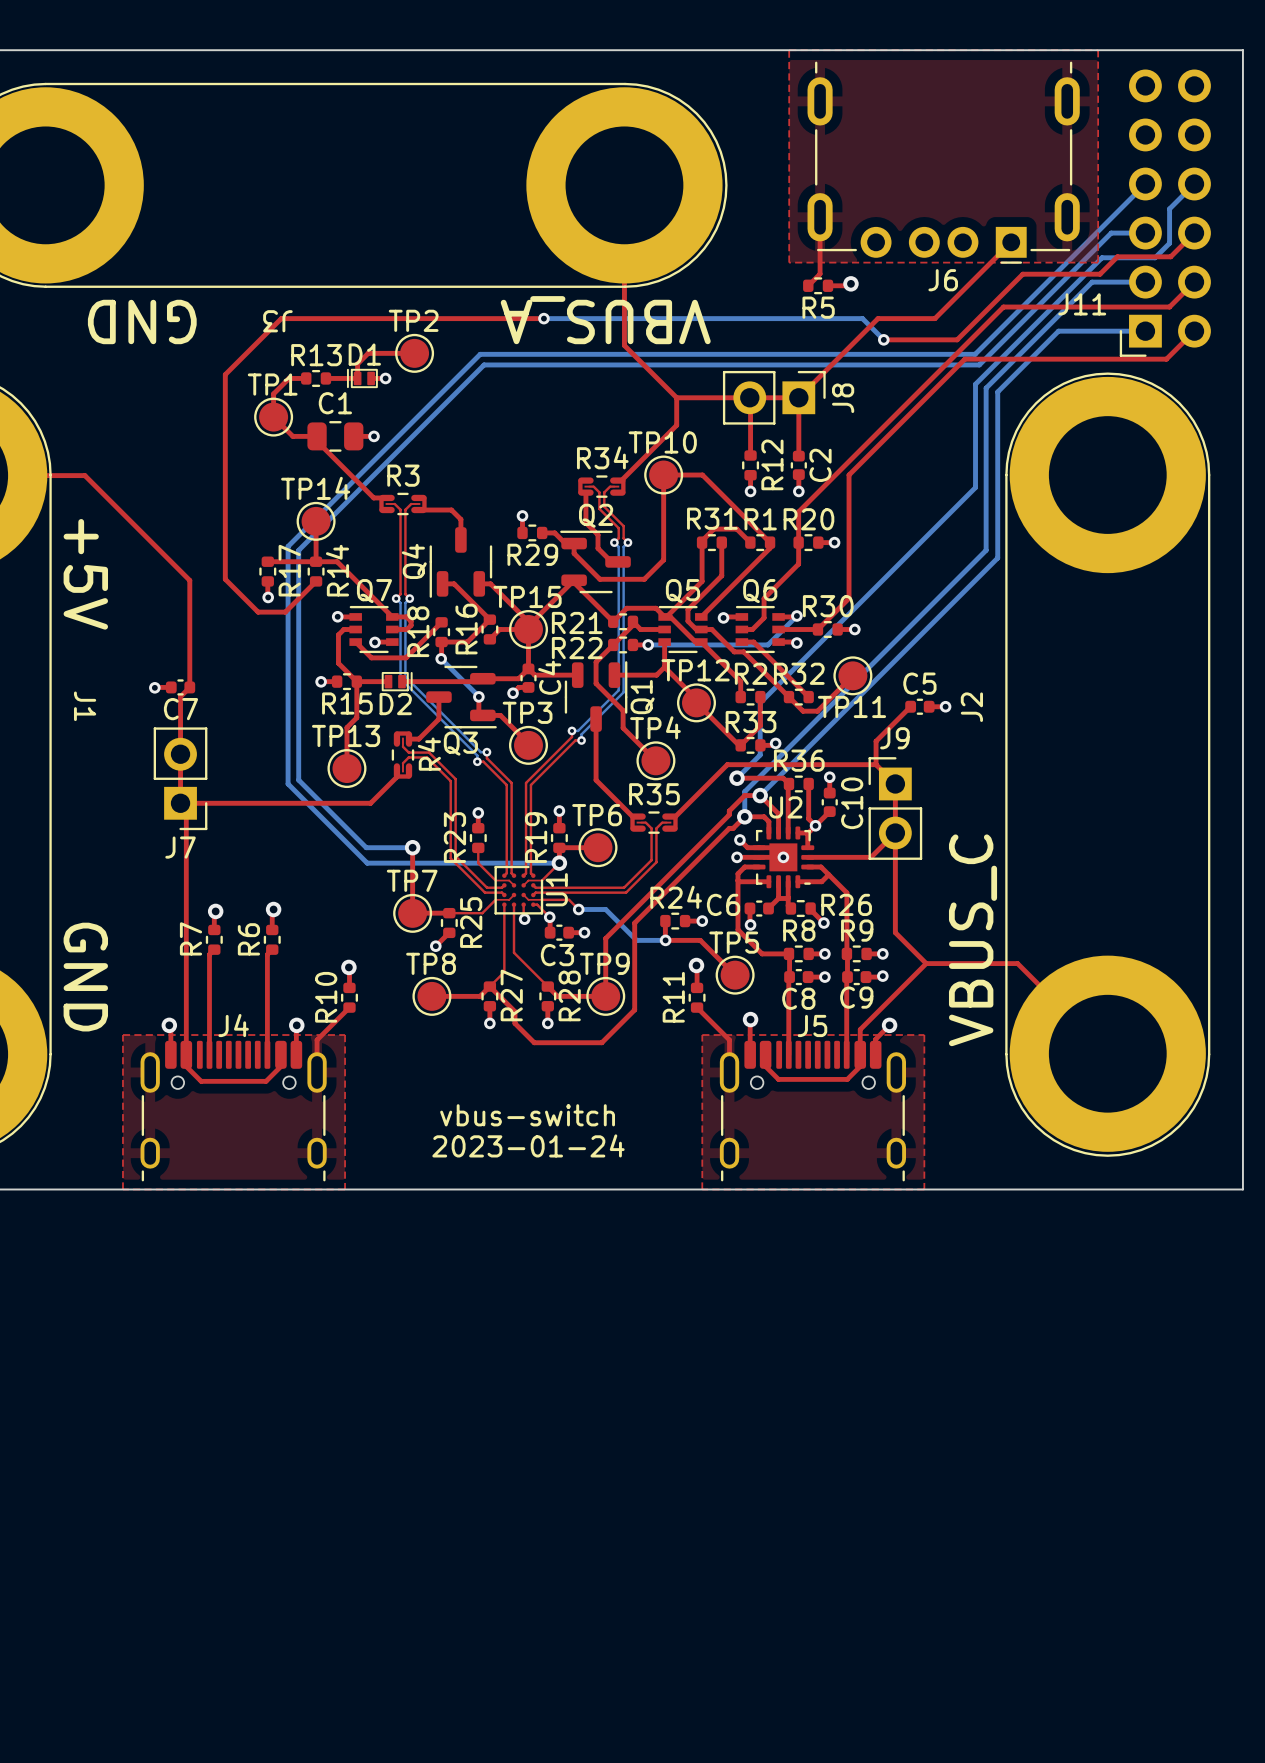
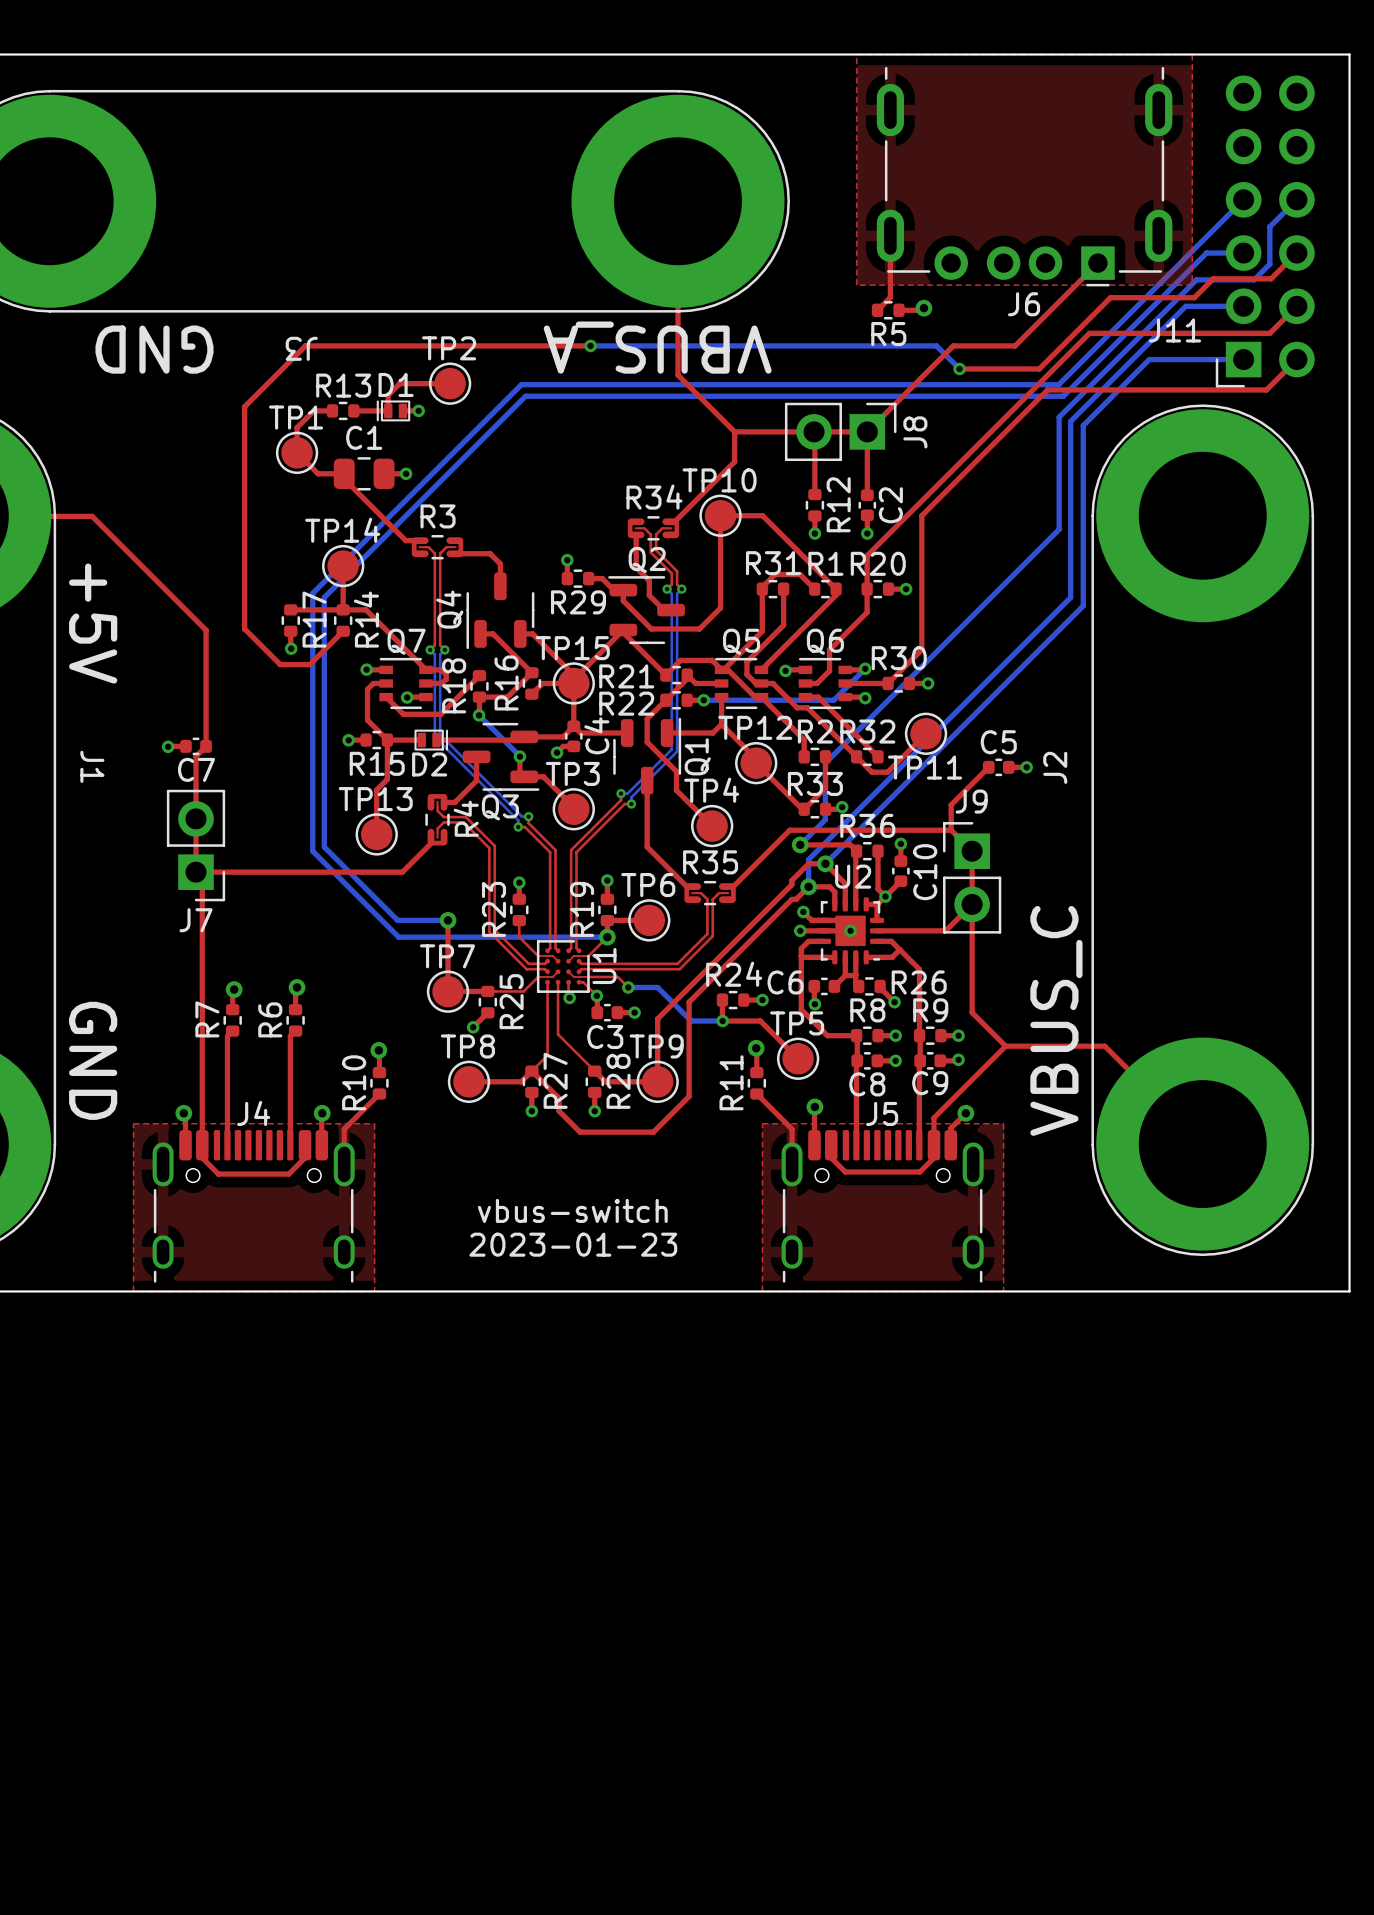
text: 2023-01-24 (528, 1145) -> 2023-01-23 (573, 1244)

